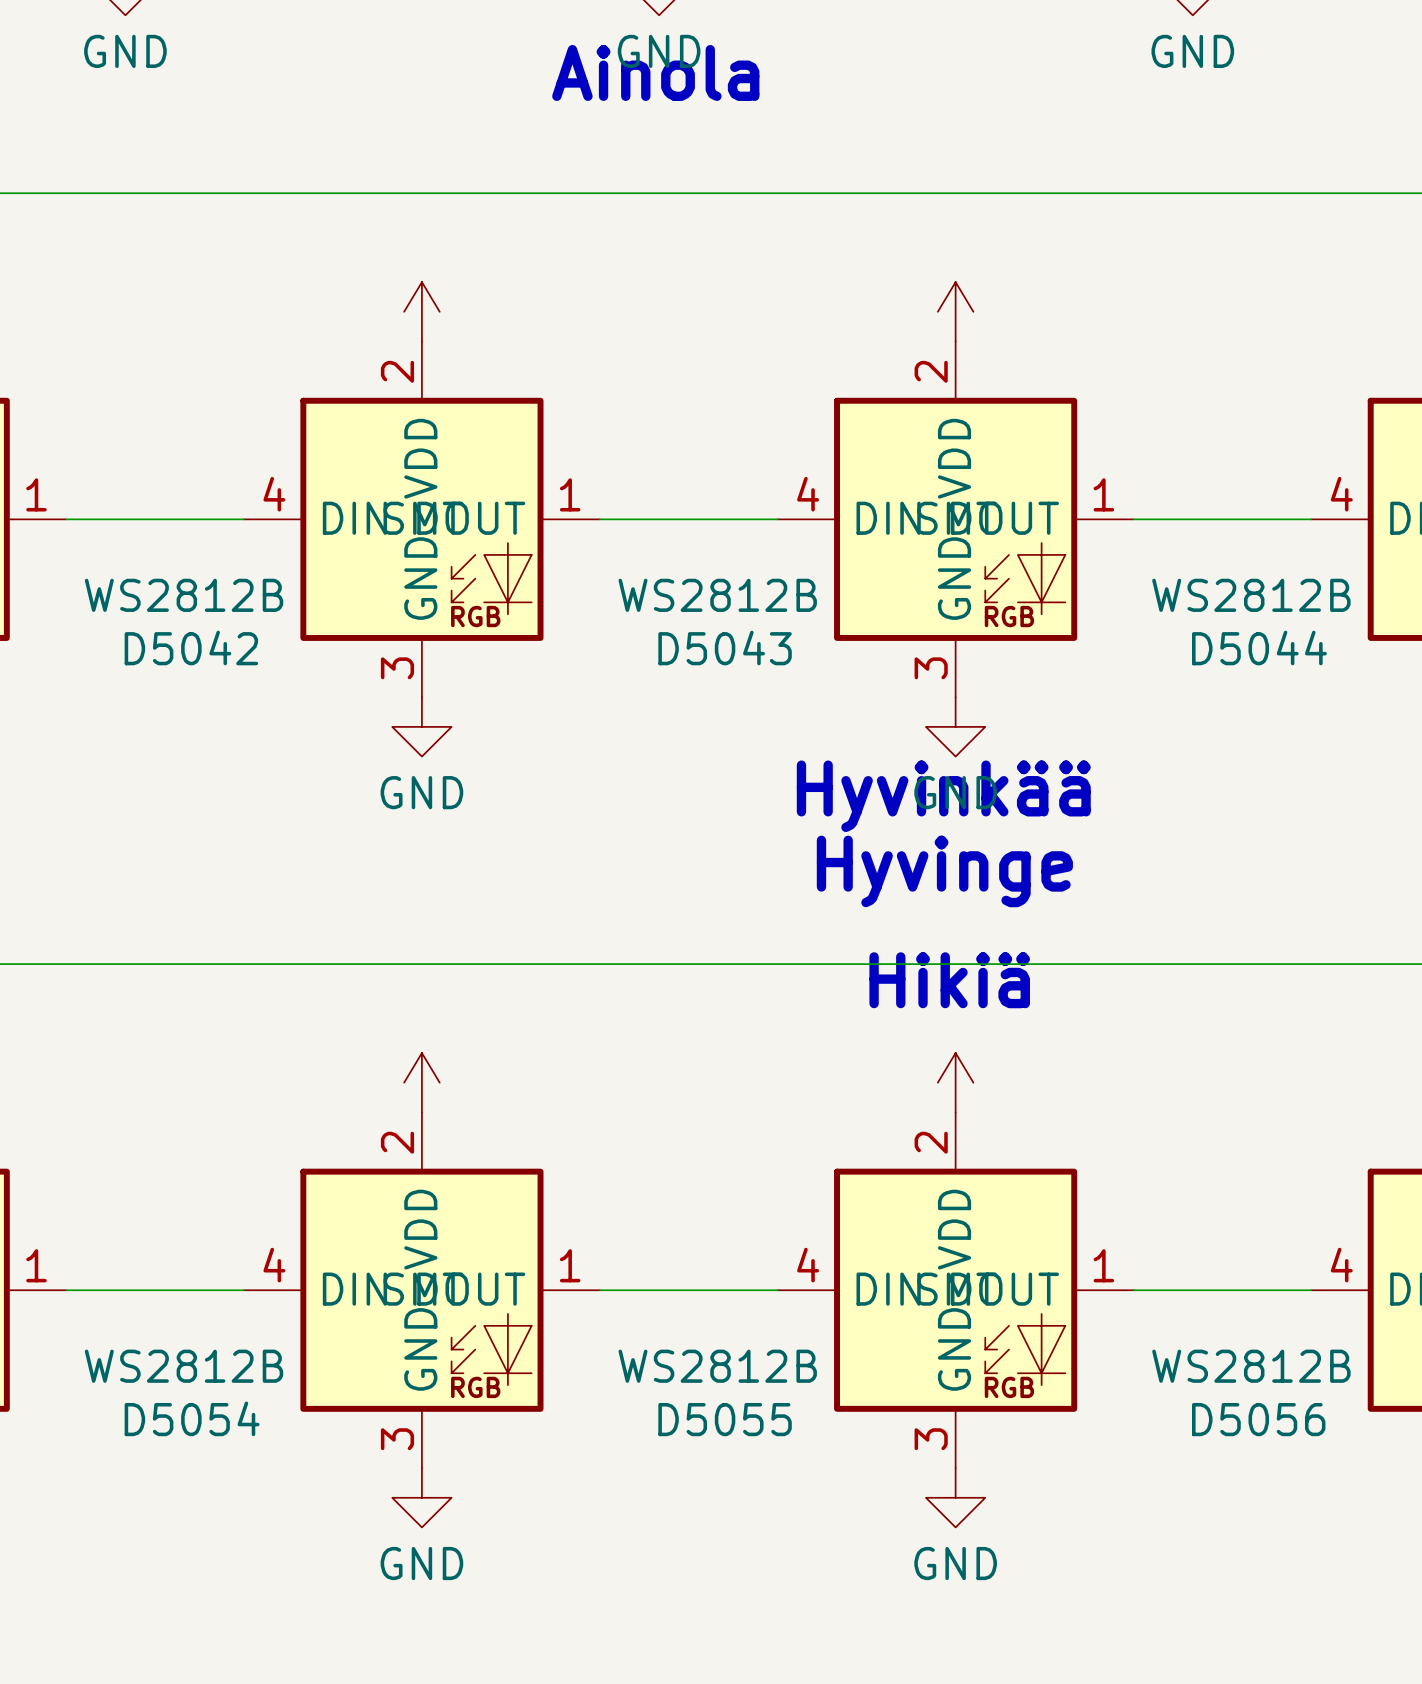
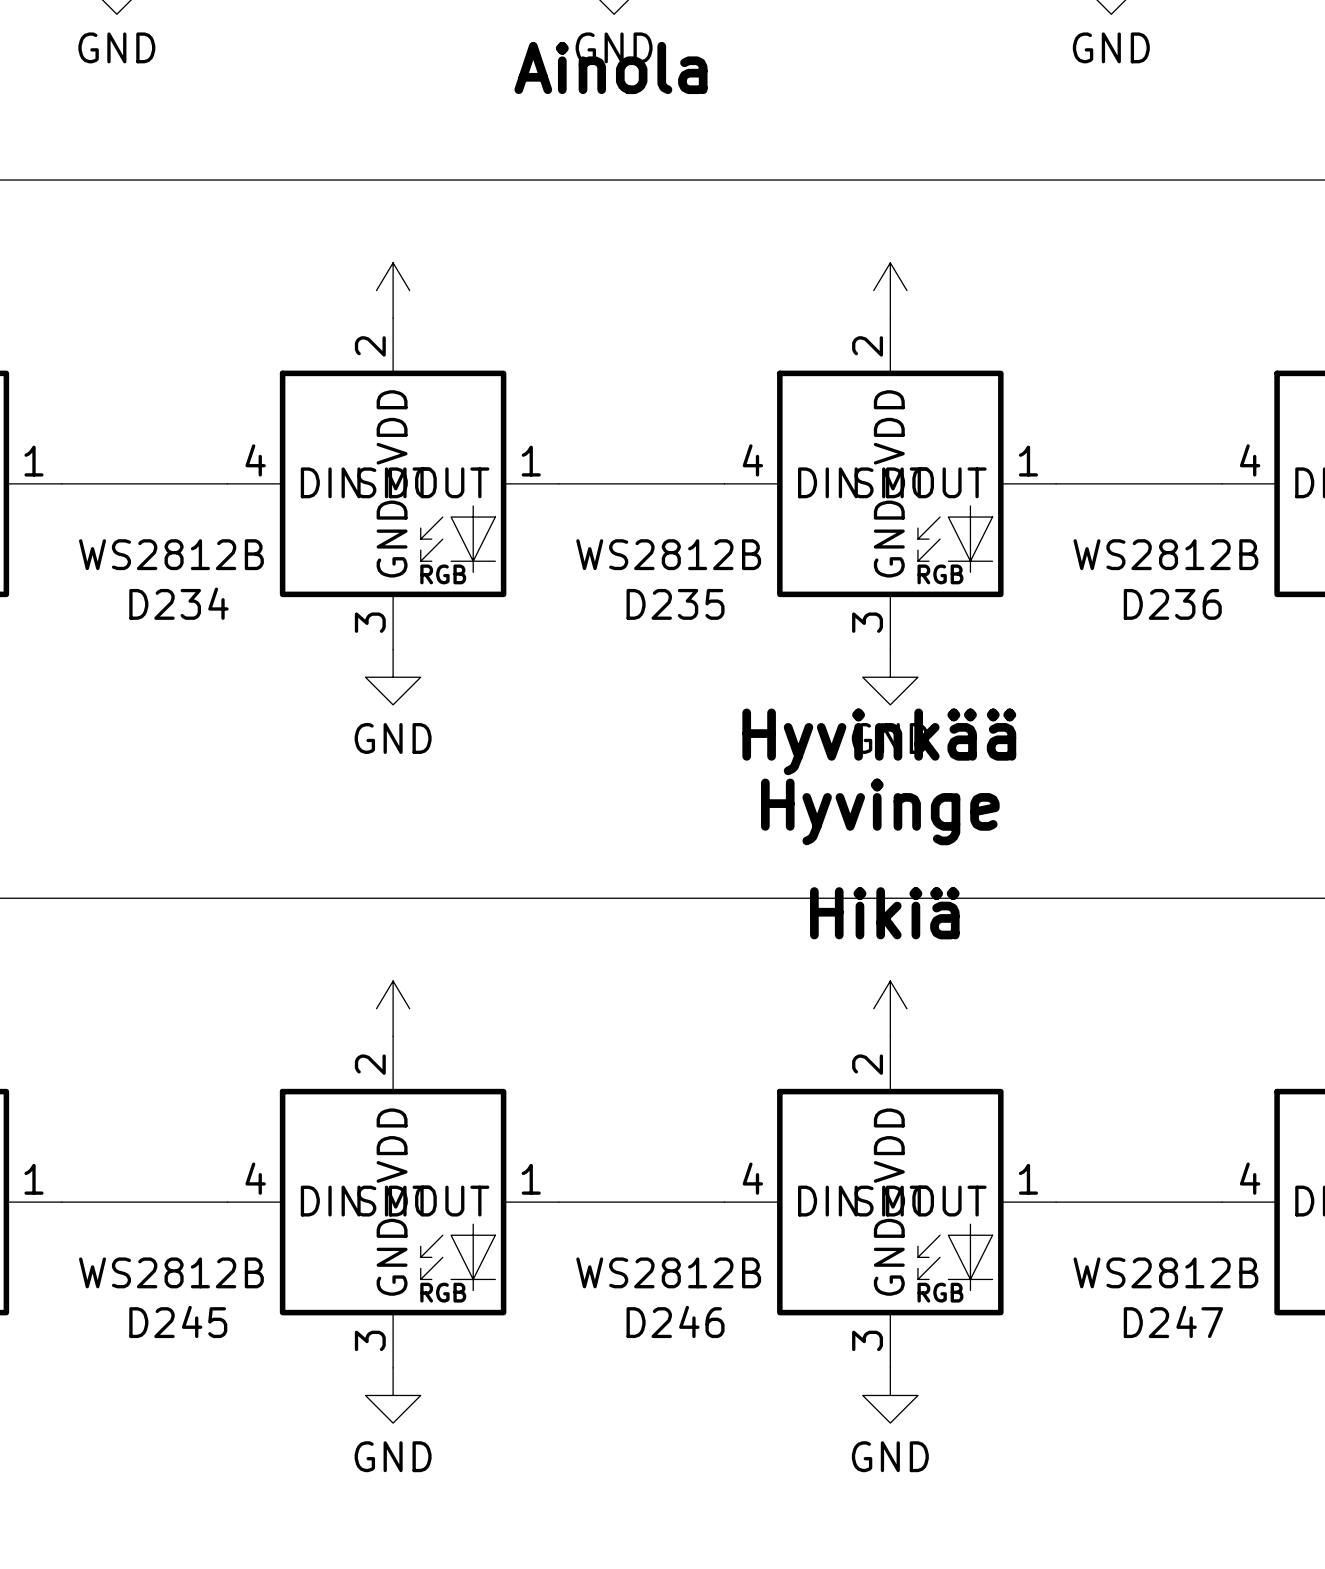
D5042 name: D5042 (191, 648) -> D234 (178, 603)
D5043 name: D5043 (725, 648) -> D235 (675, 604)
D5044 name: D5044 (1259, 648) -> D236 (1172, 604)
D5054 name: D5054 (192, 1418) -> D245 (178, 1321)
D5055 name: D5055 (725, 1419) -> D246 (675, 1321)
D5056 name: D5056 (1258, 1419) -> D247 (1173, 1321)

